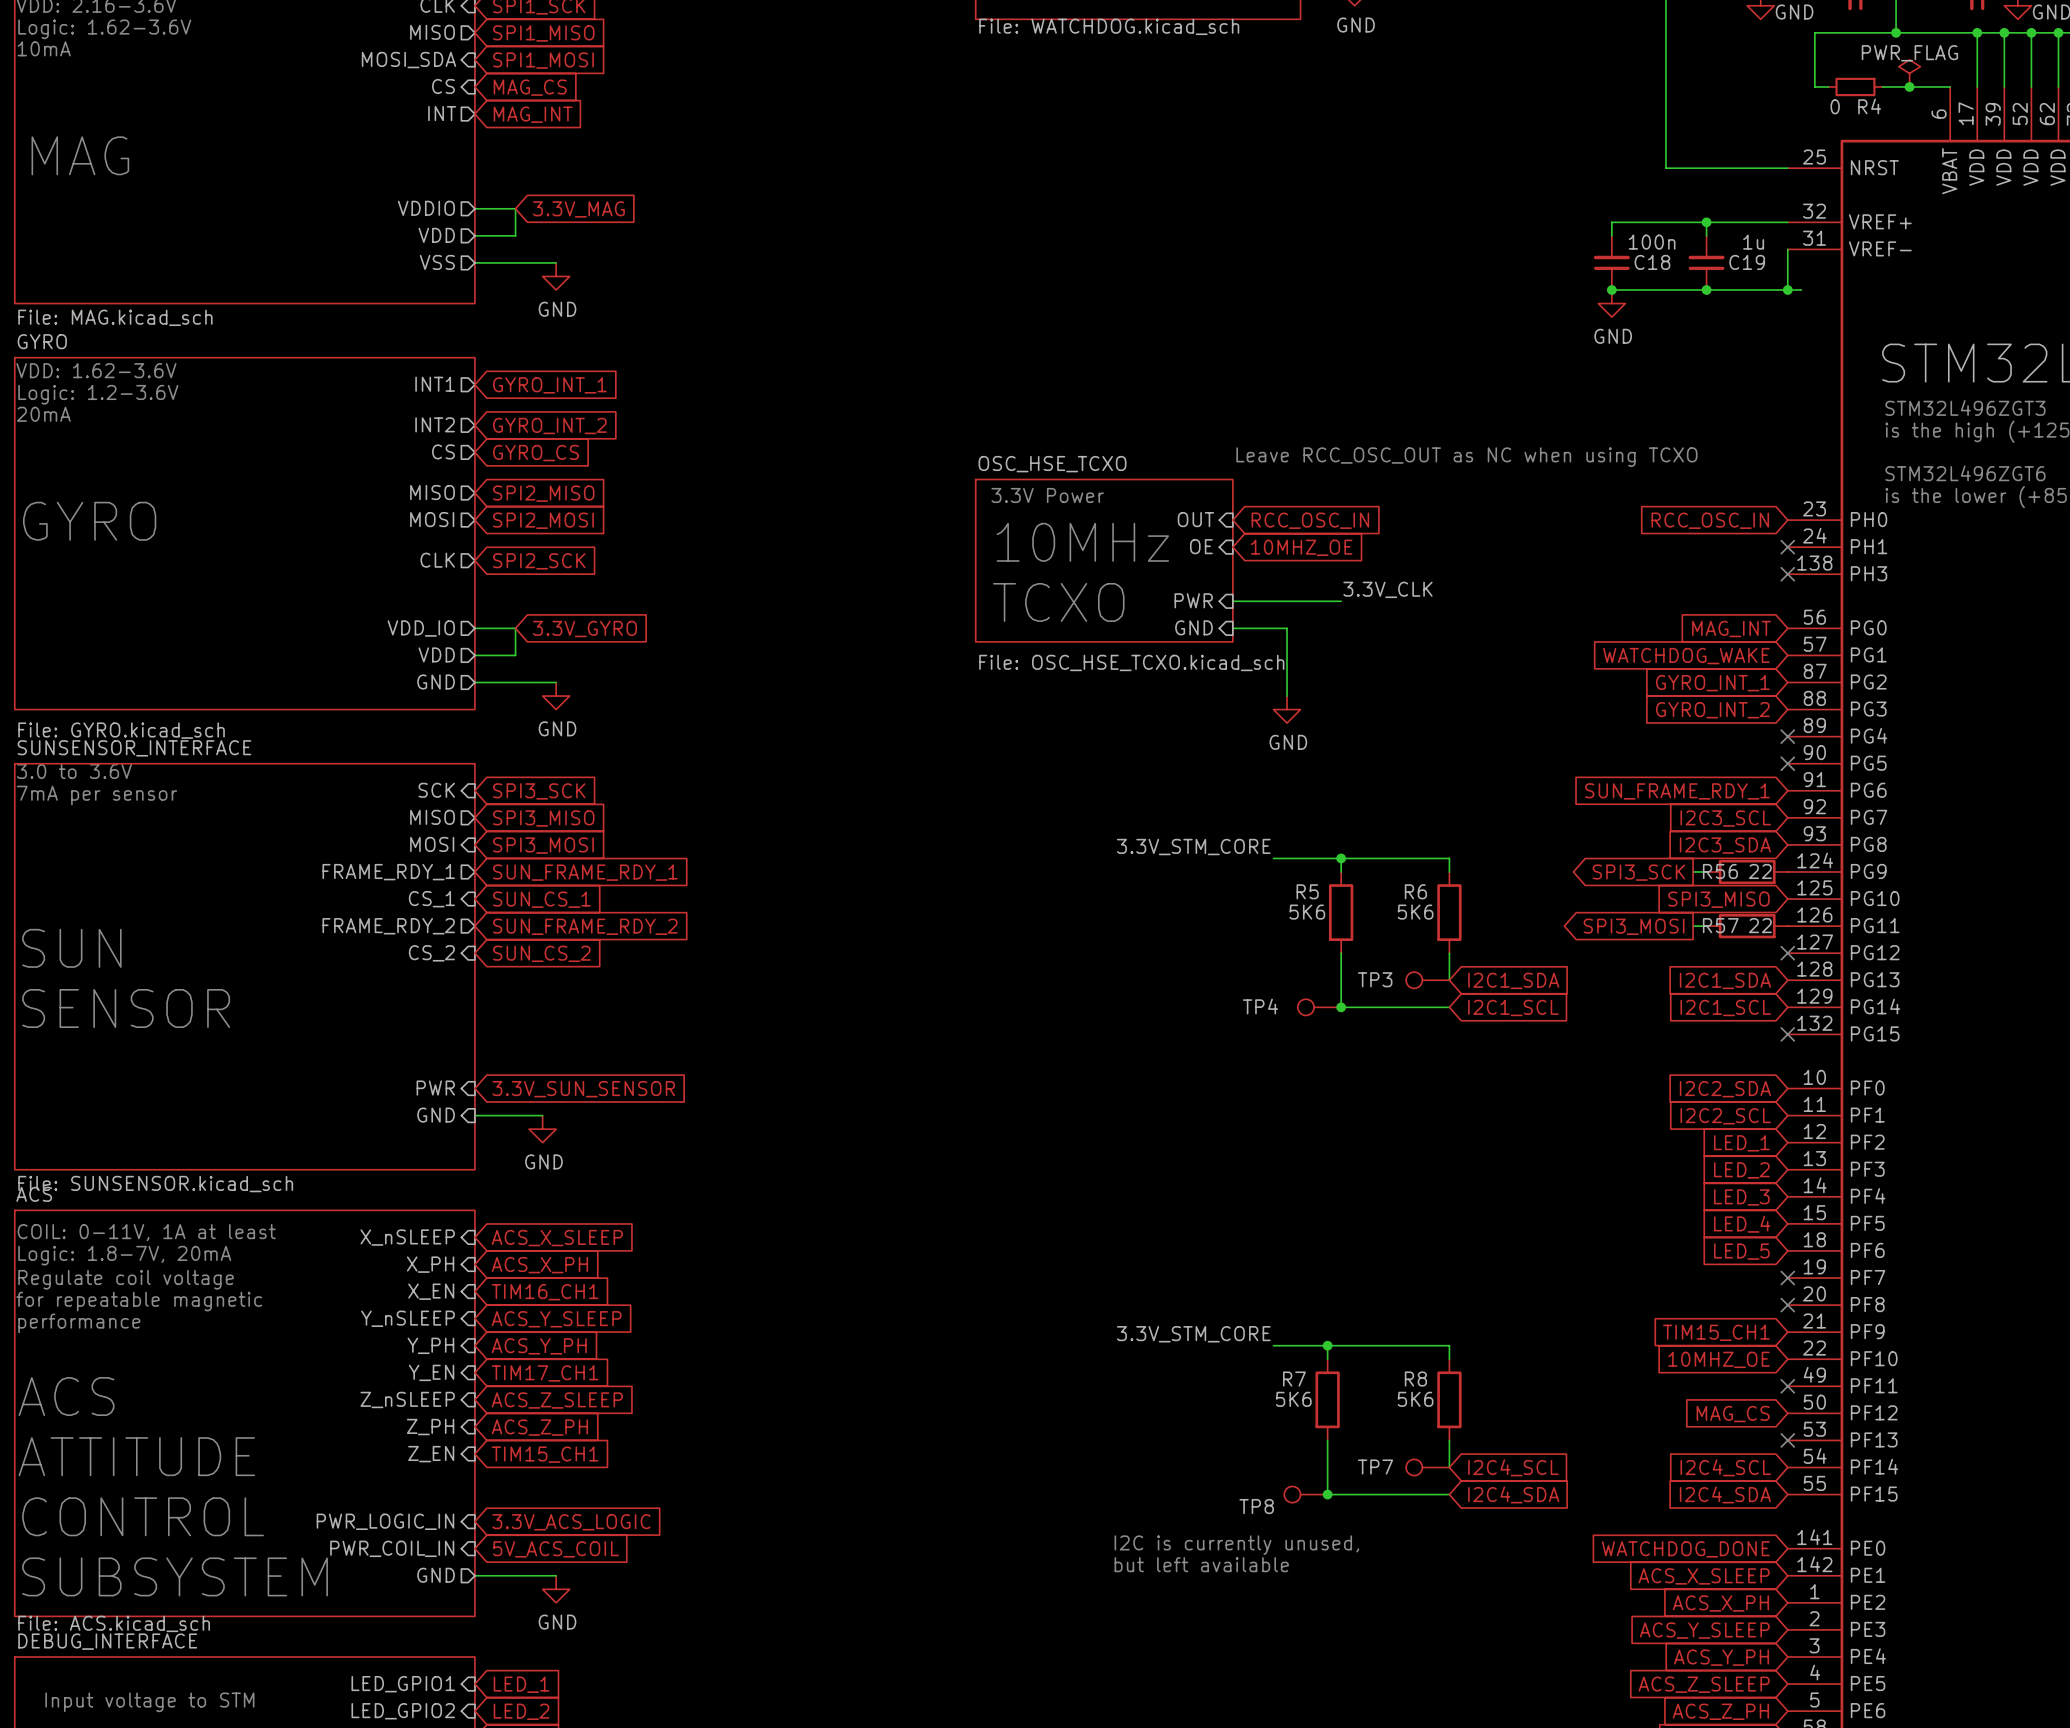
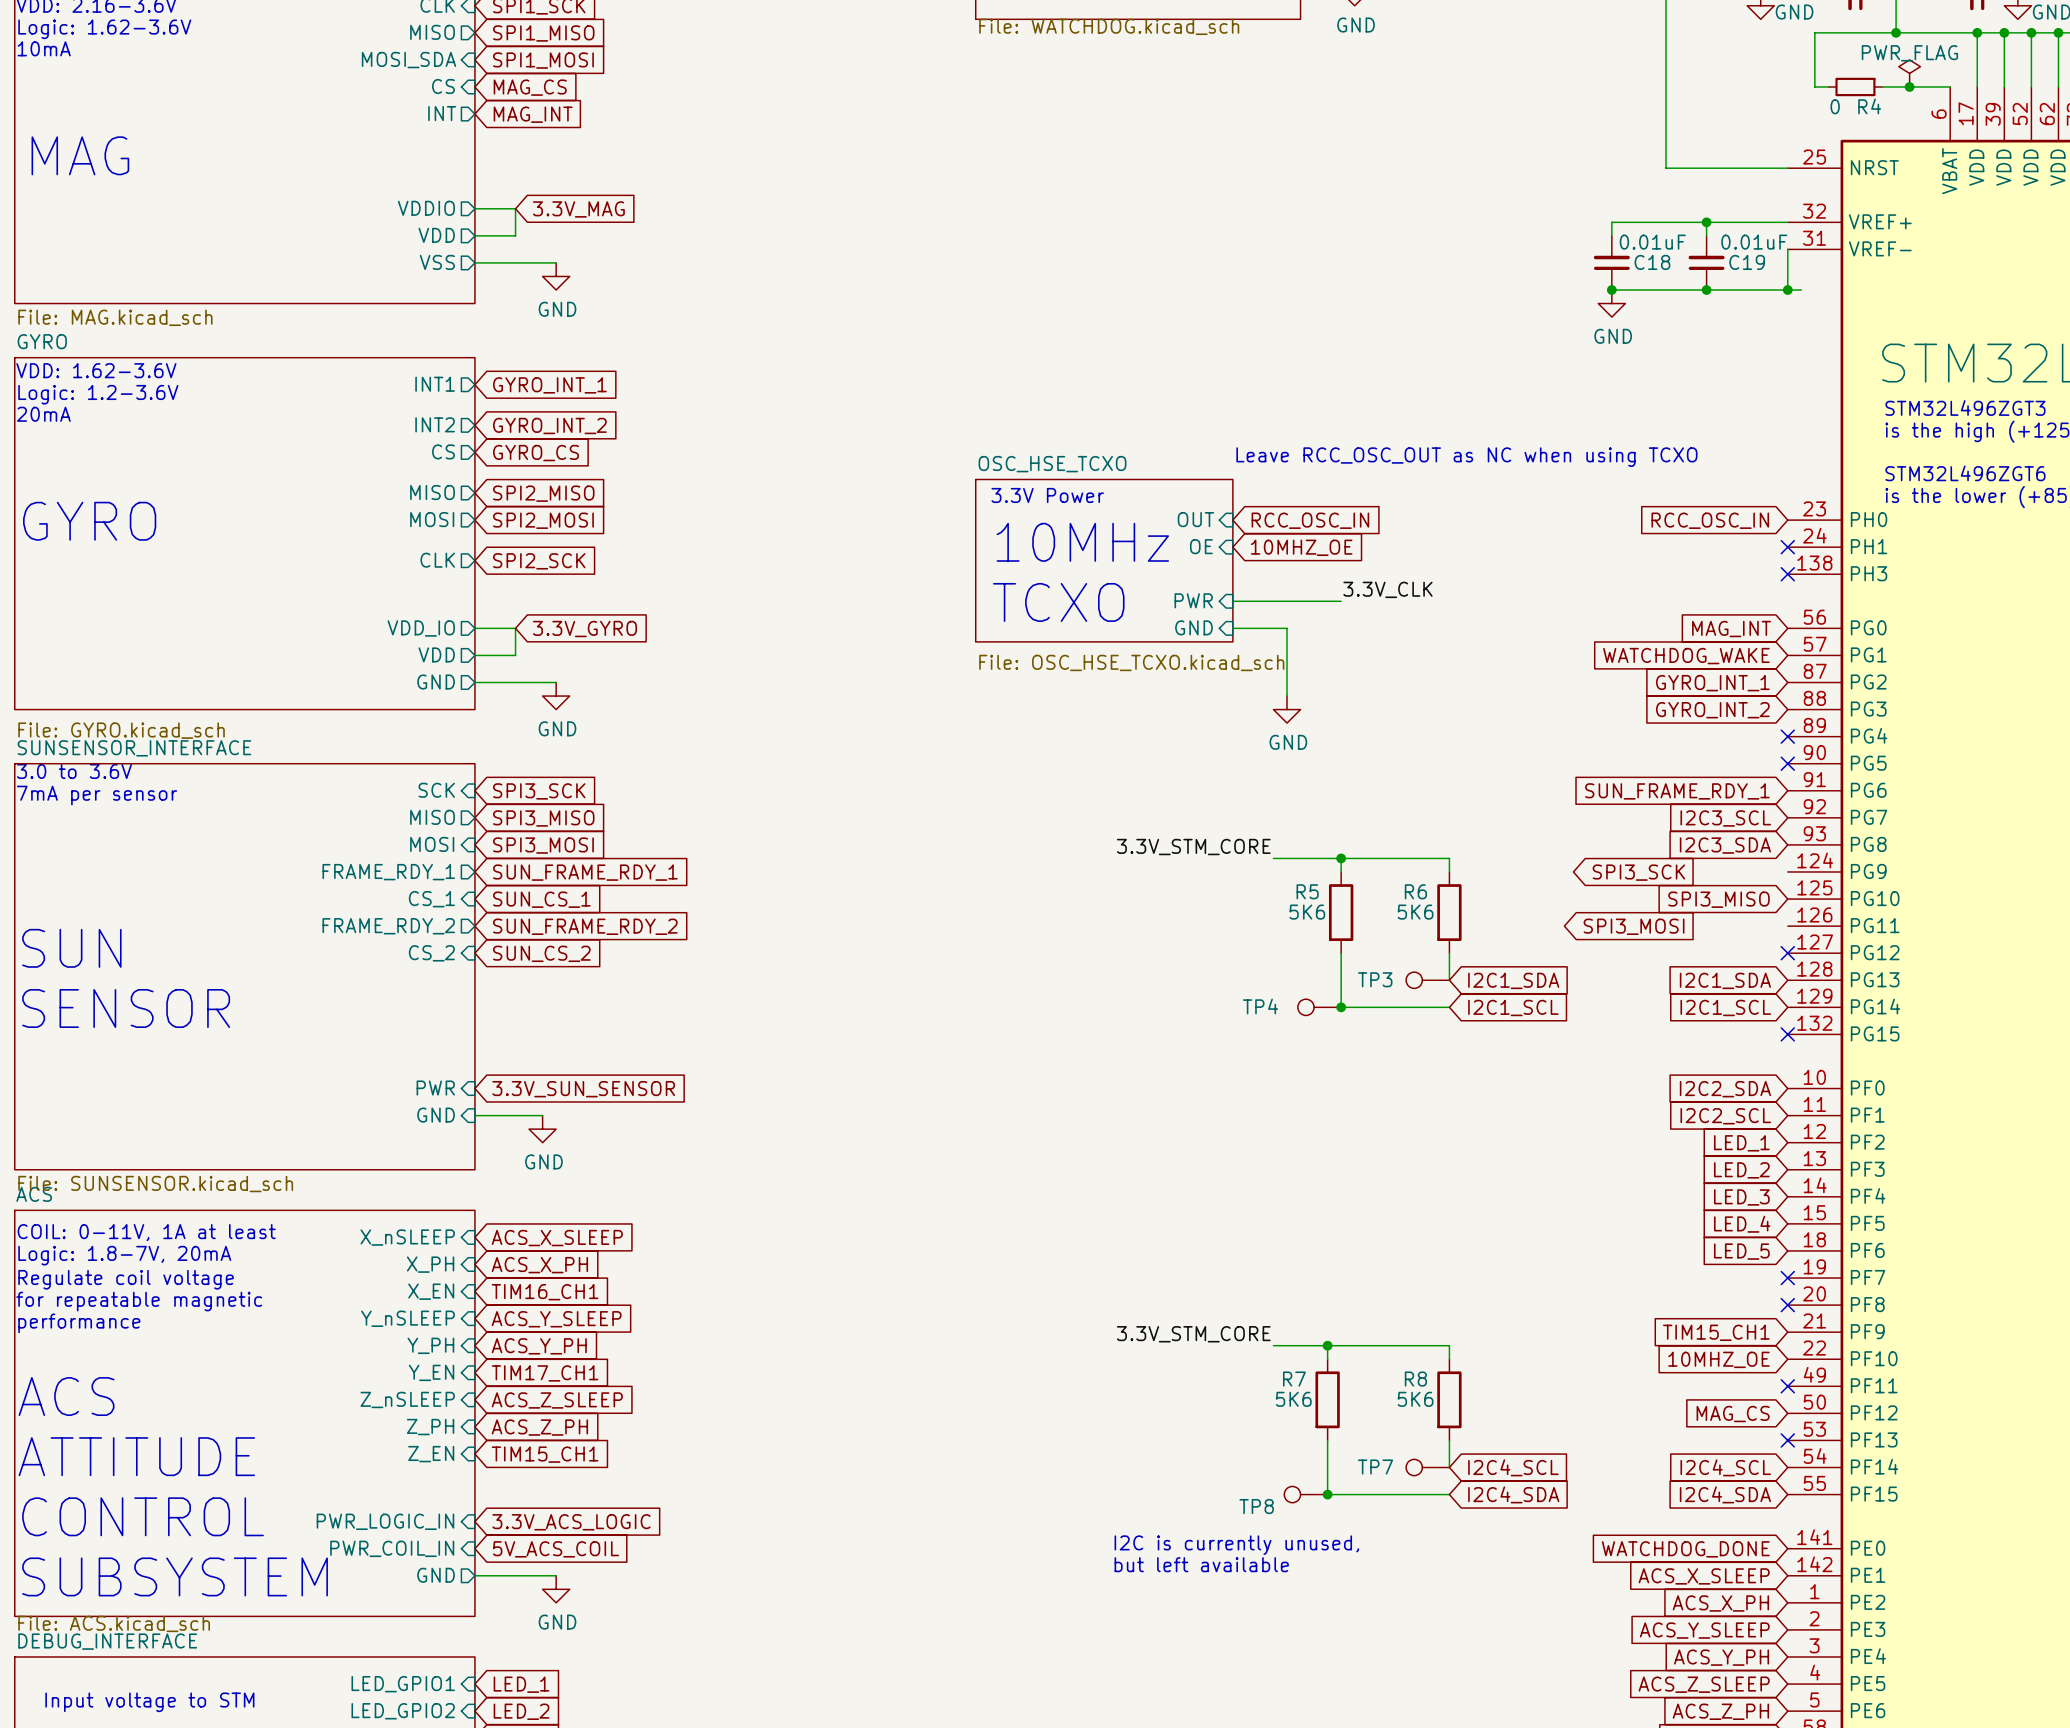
C18 value: 100n (1652, 242) -> 0.01uF (1652, 242)
C19 value: 1u (1753, 242) -> 0.01uF (1754, 242)
wire: (1693, 871) (1706, 871) -> none
R56: 22 (1747, 871) -> none
wire: (1693, 926) (1706, 926) -> none
R57: 22 (1747, 926) -> none

